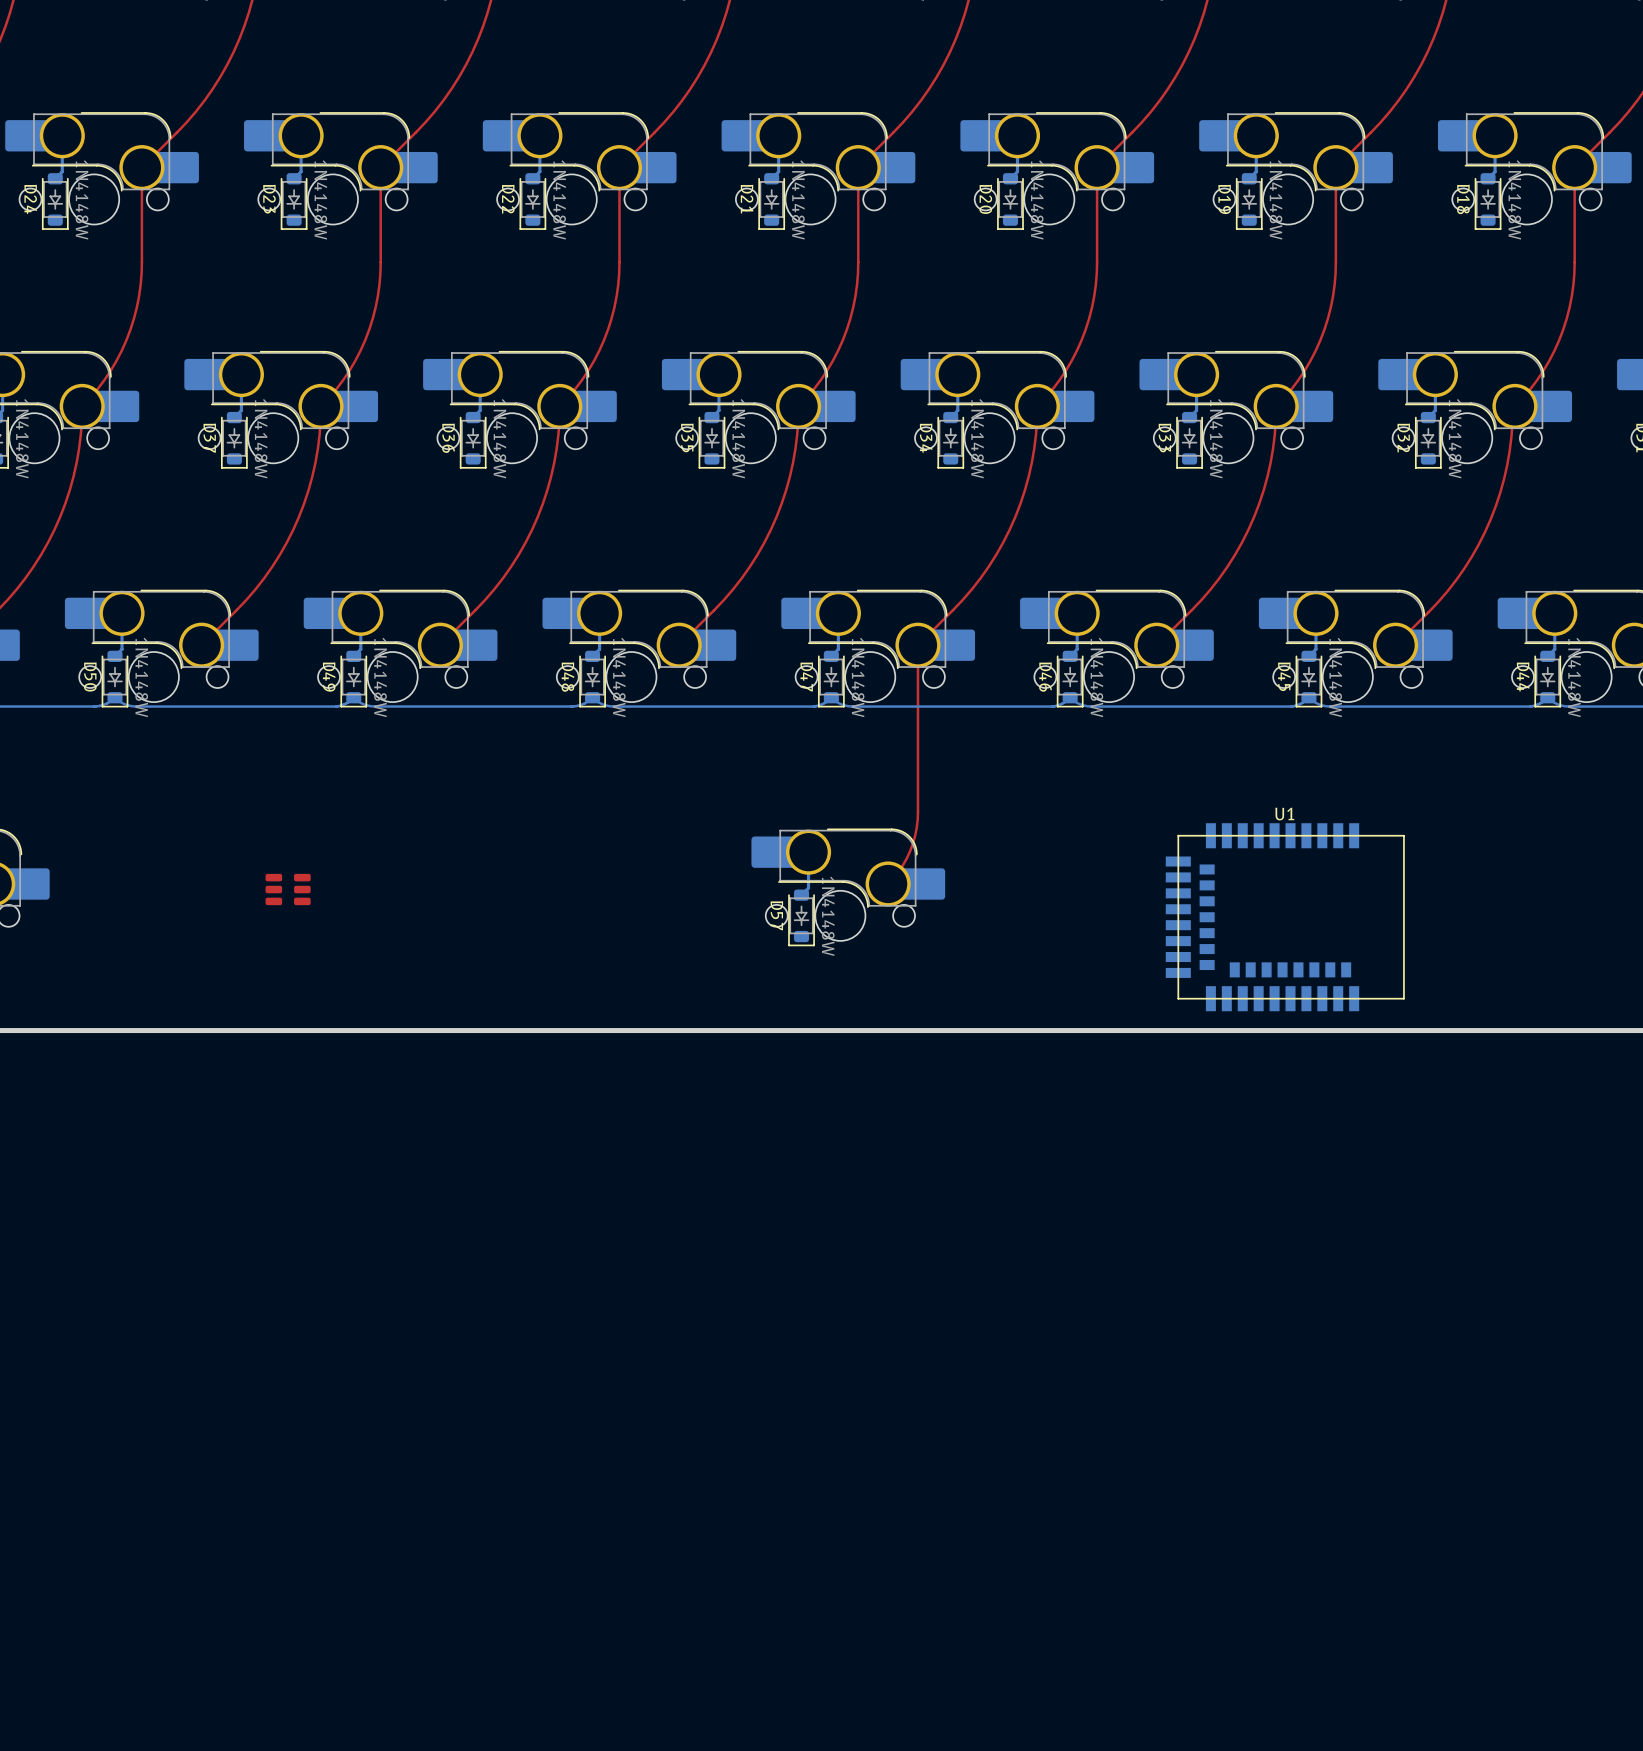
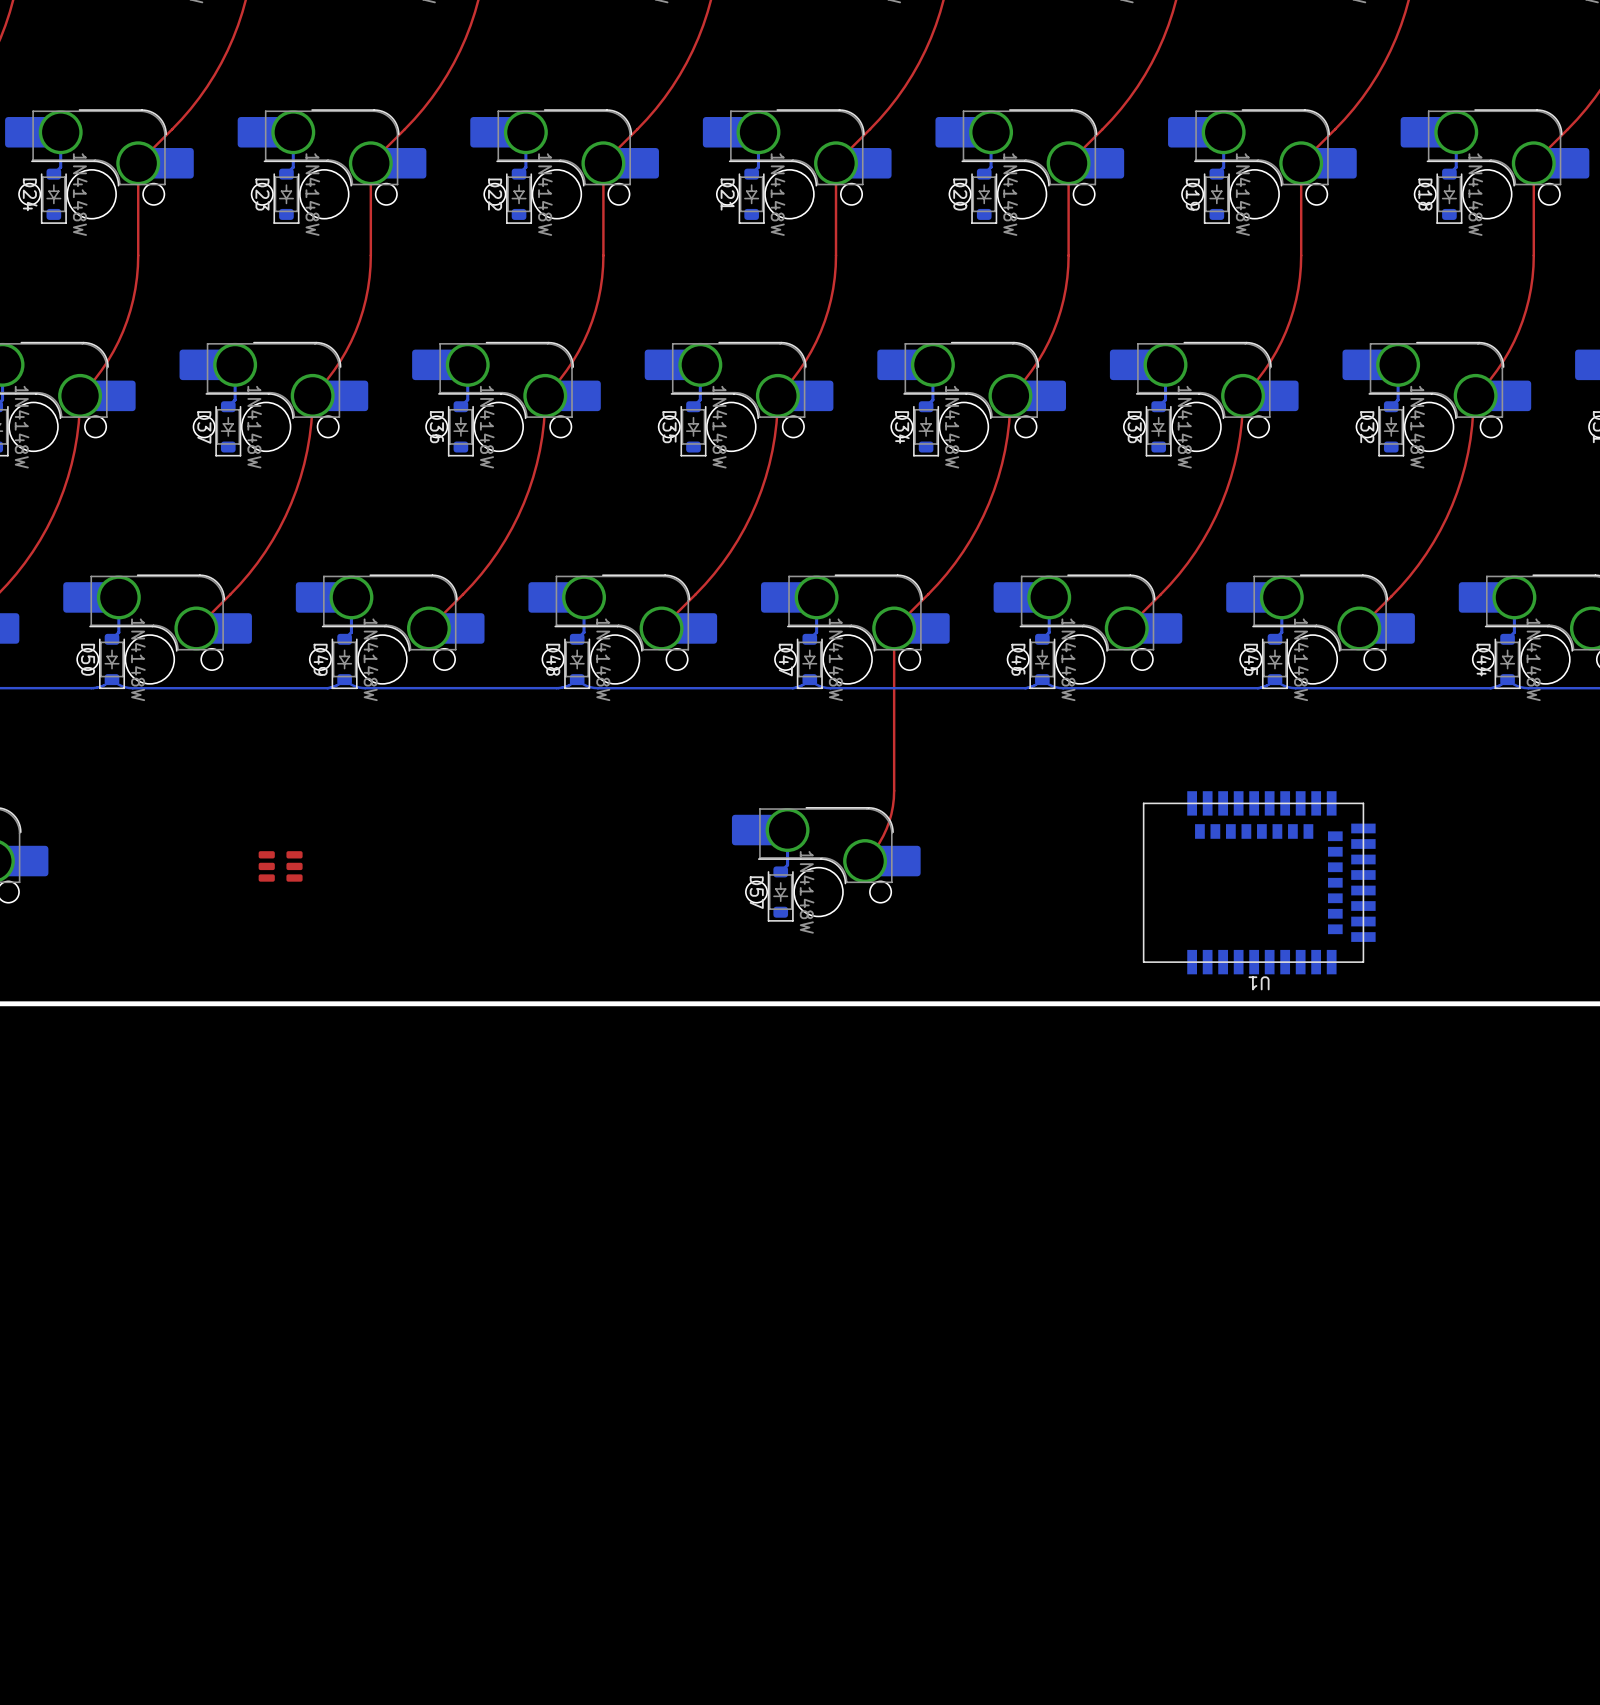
U1 rotation: 0° (1285, 917) -> 180° (1259, 882)

